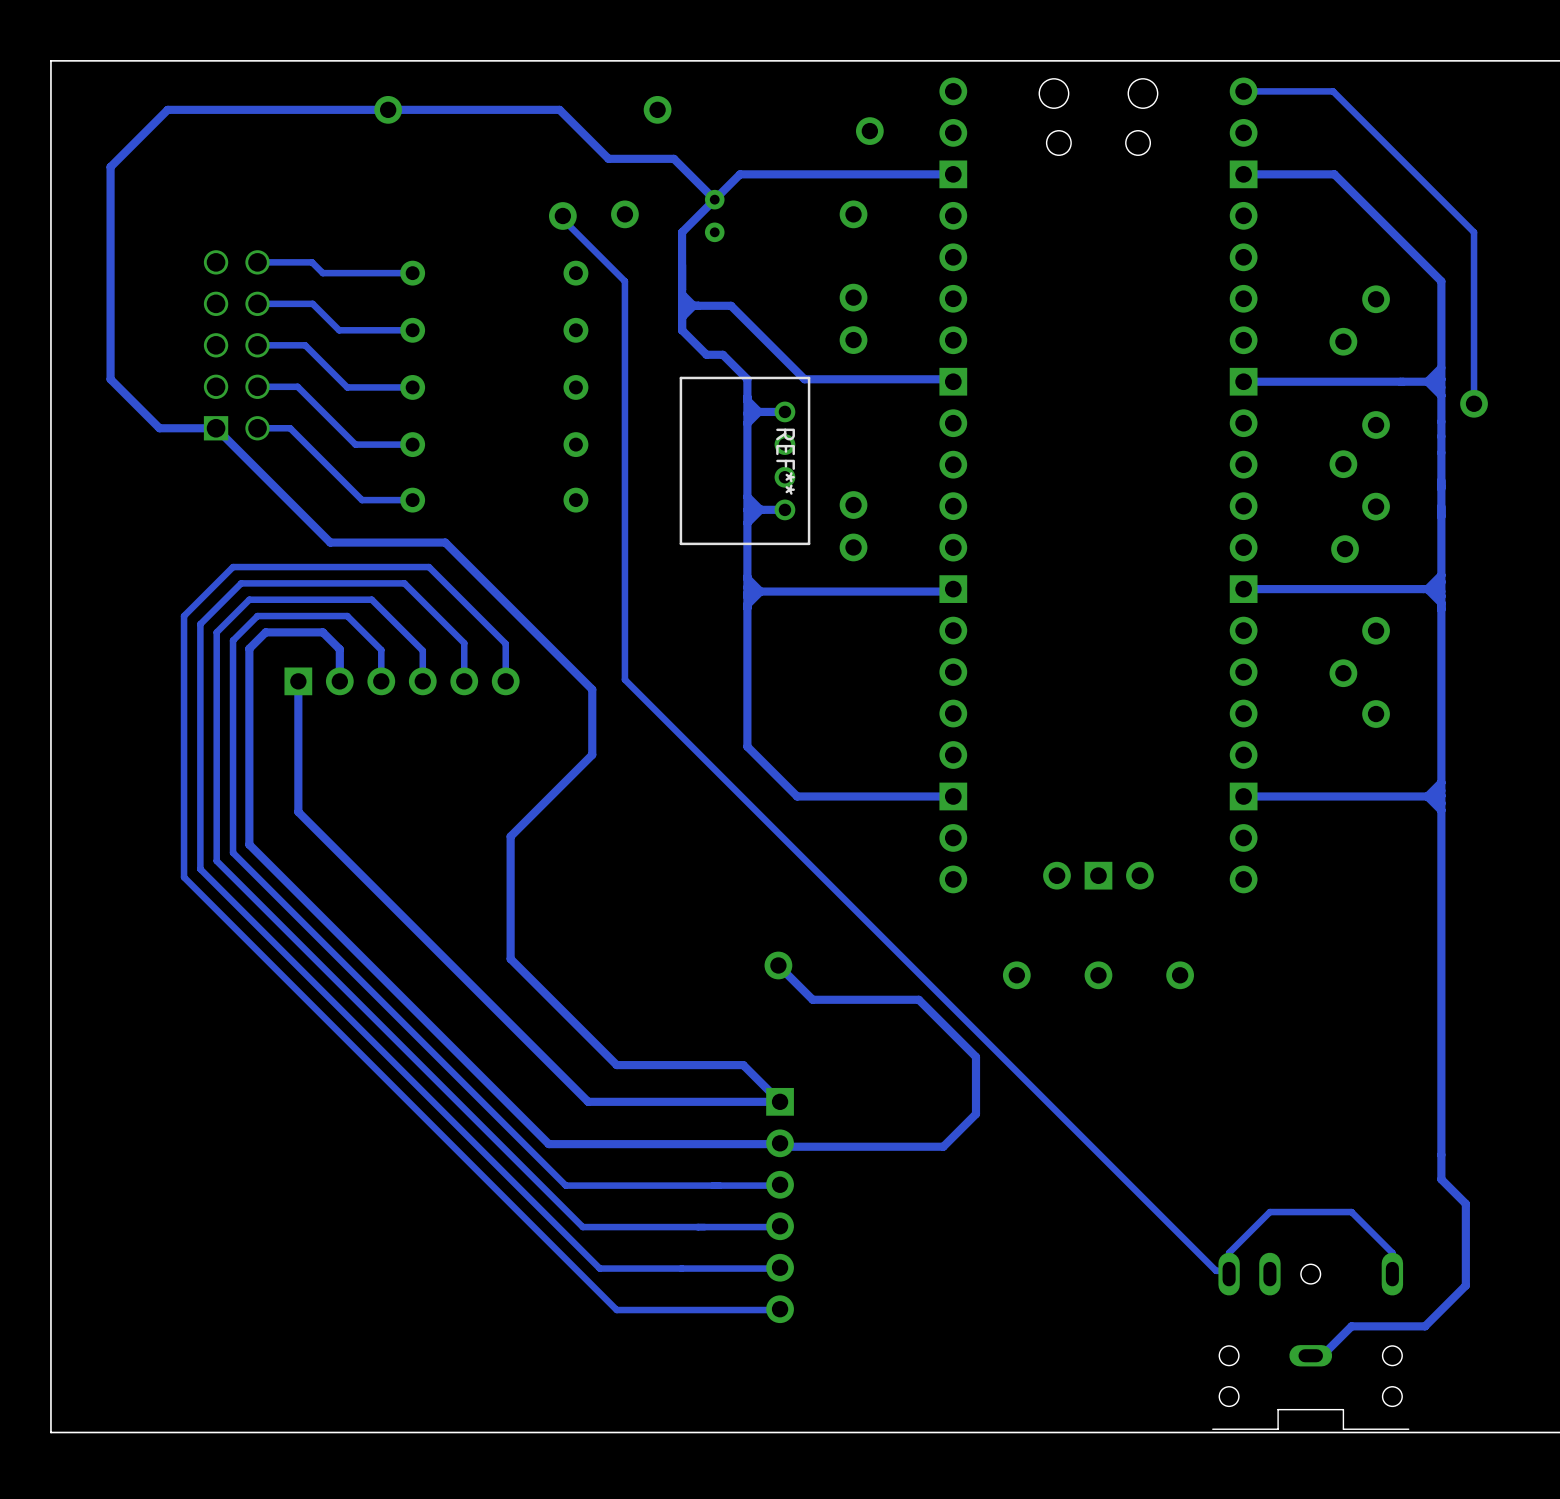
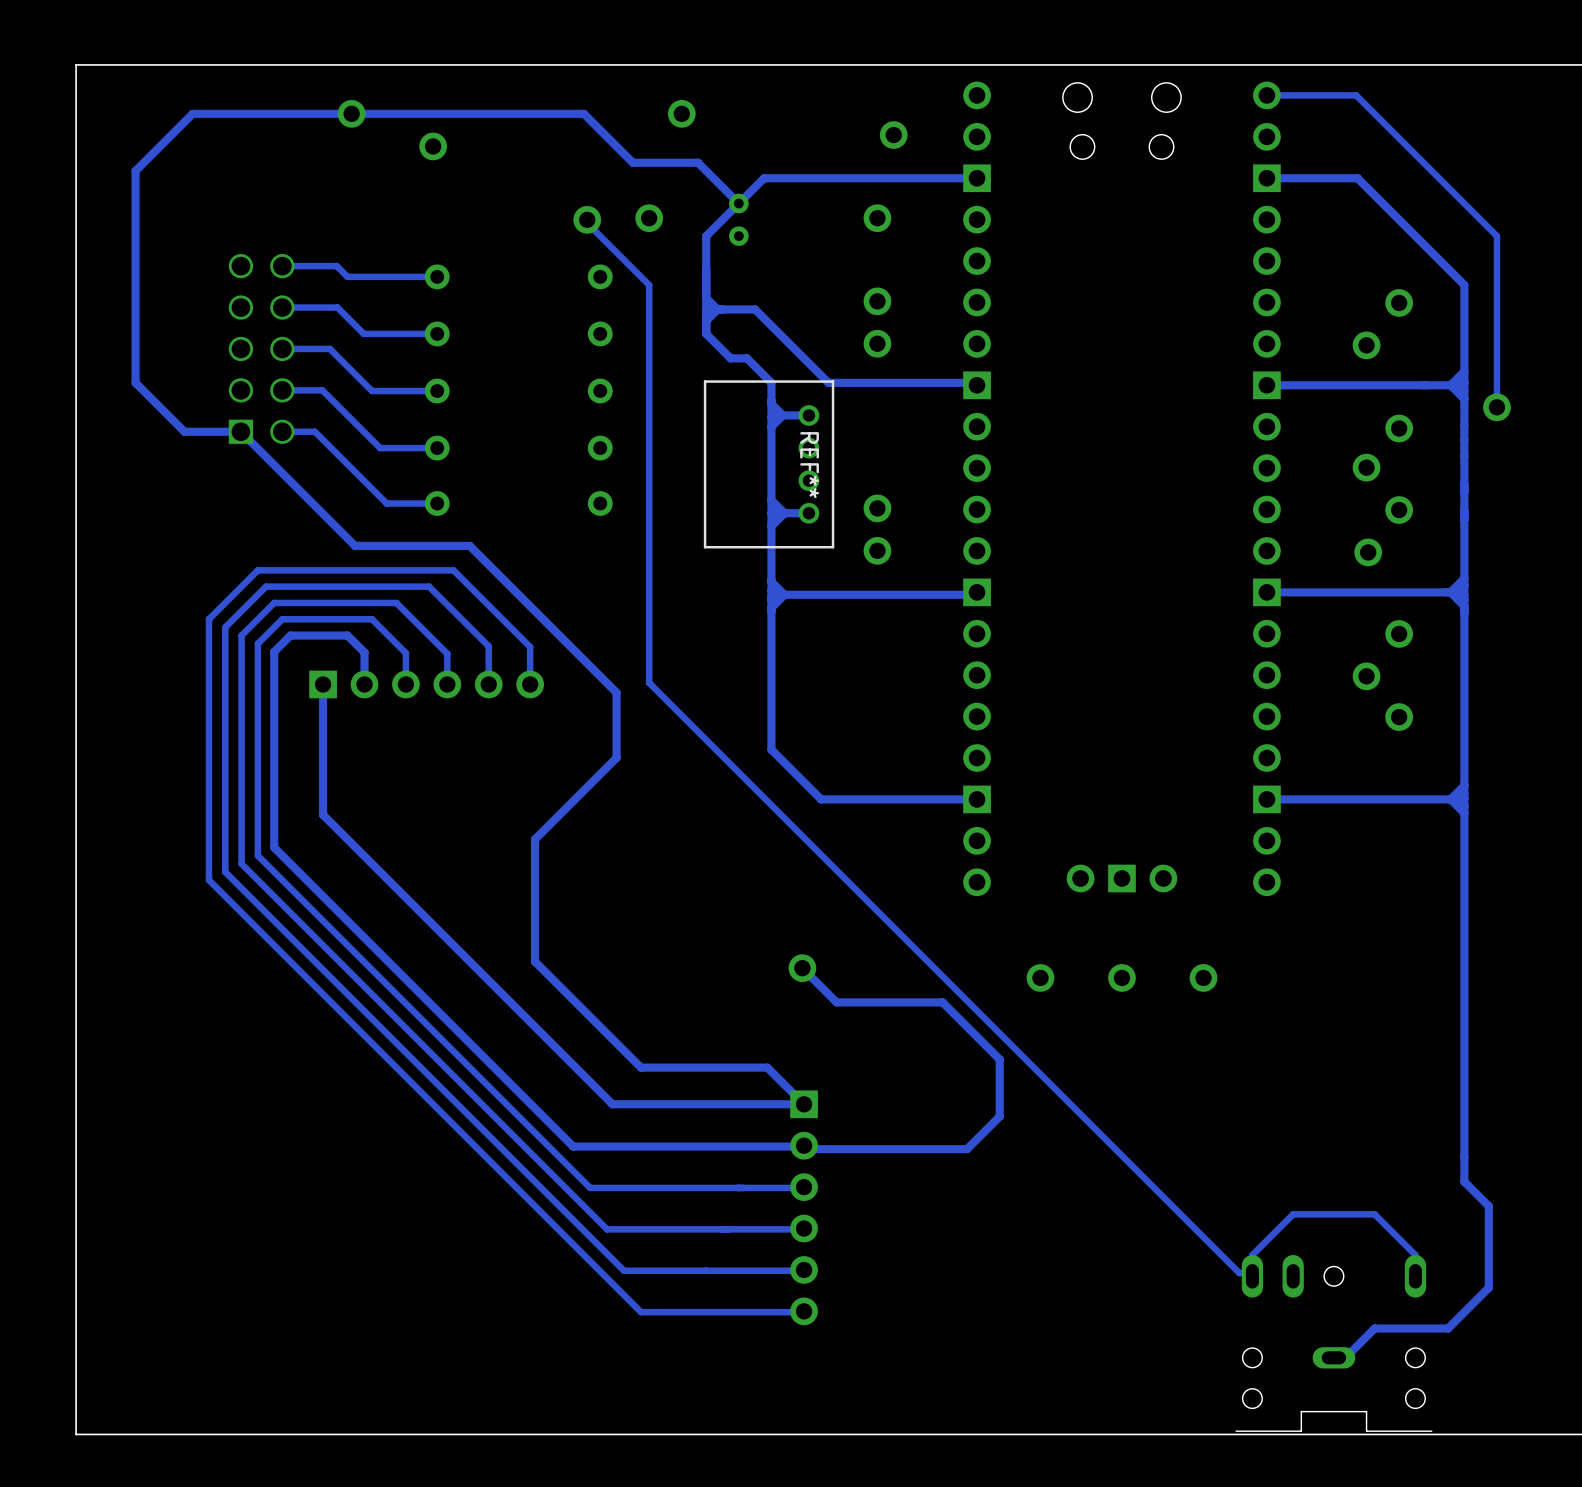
part: none -> (351, 113)
part: (388, 109) -> none
part: none -> (433, 146)

